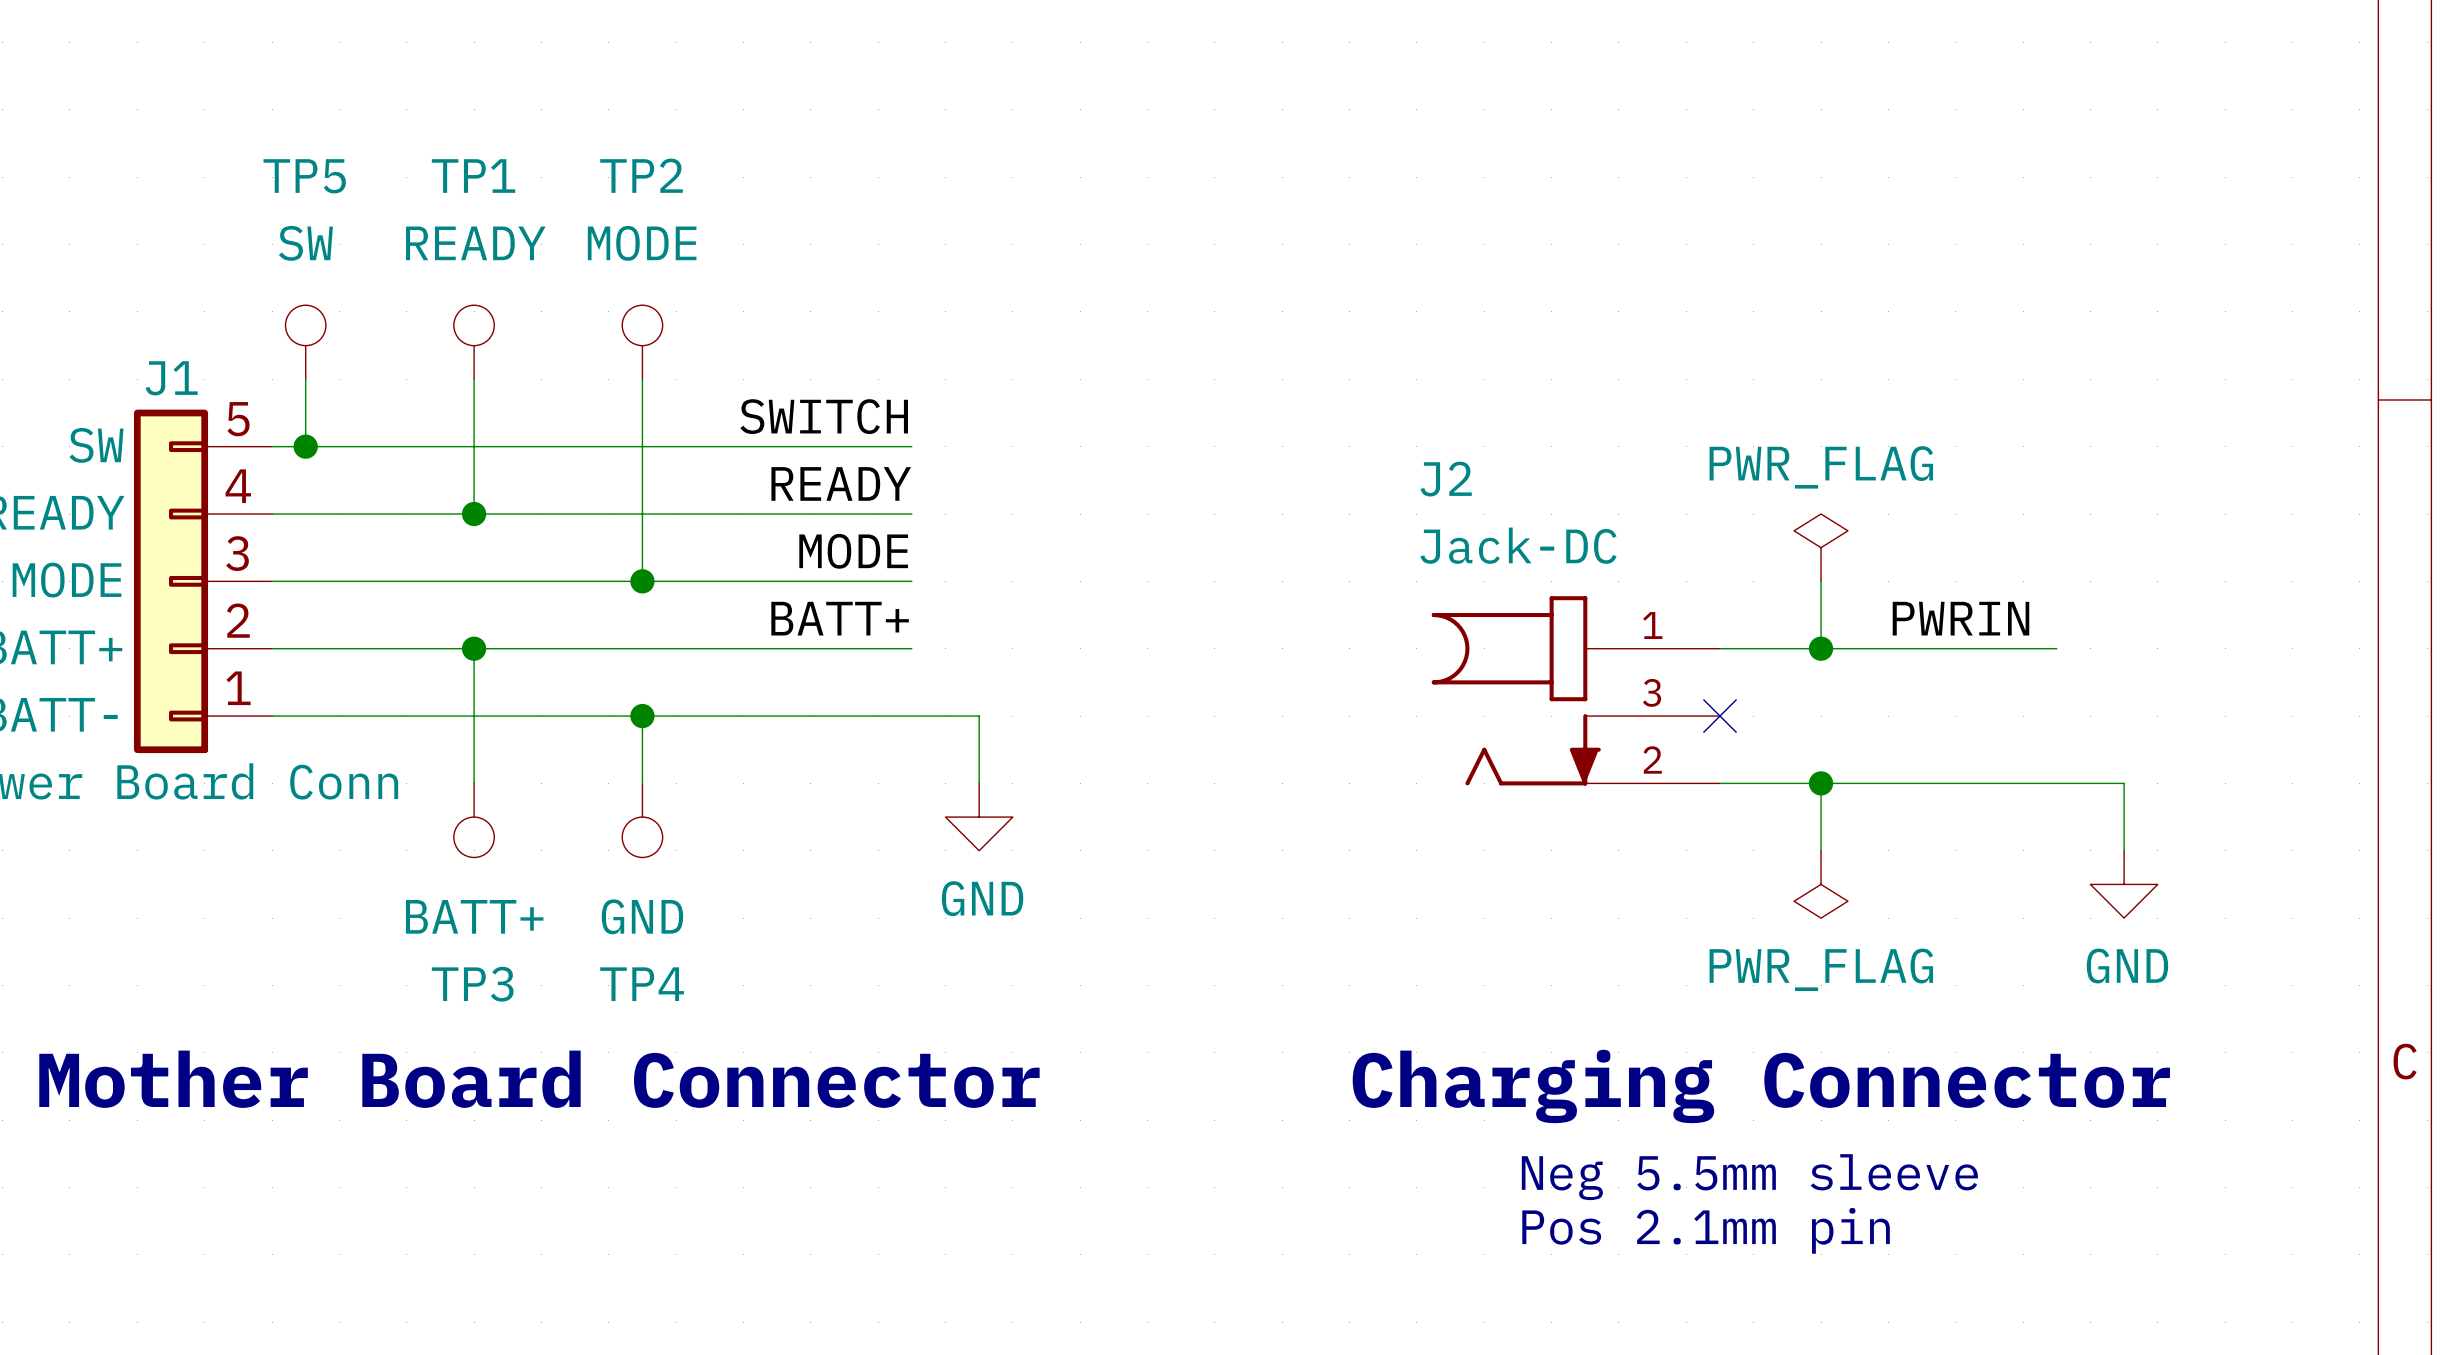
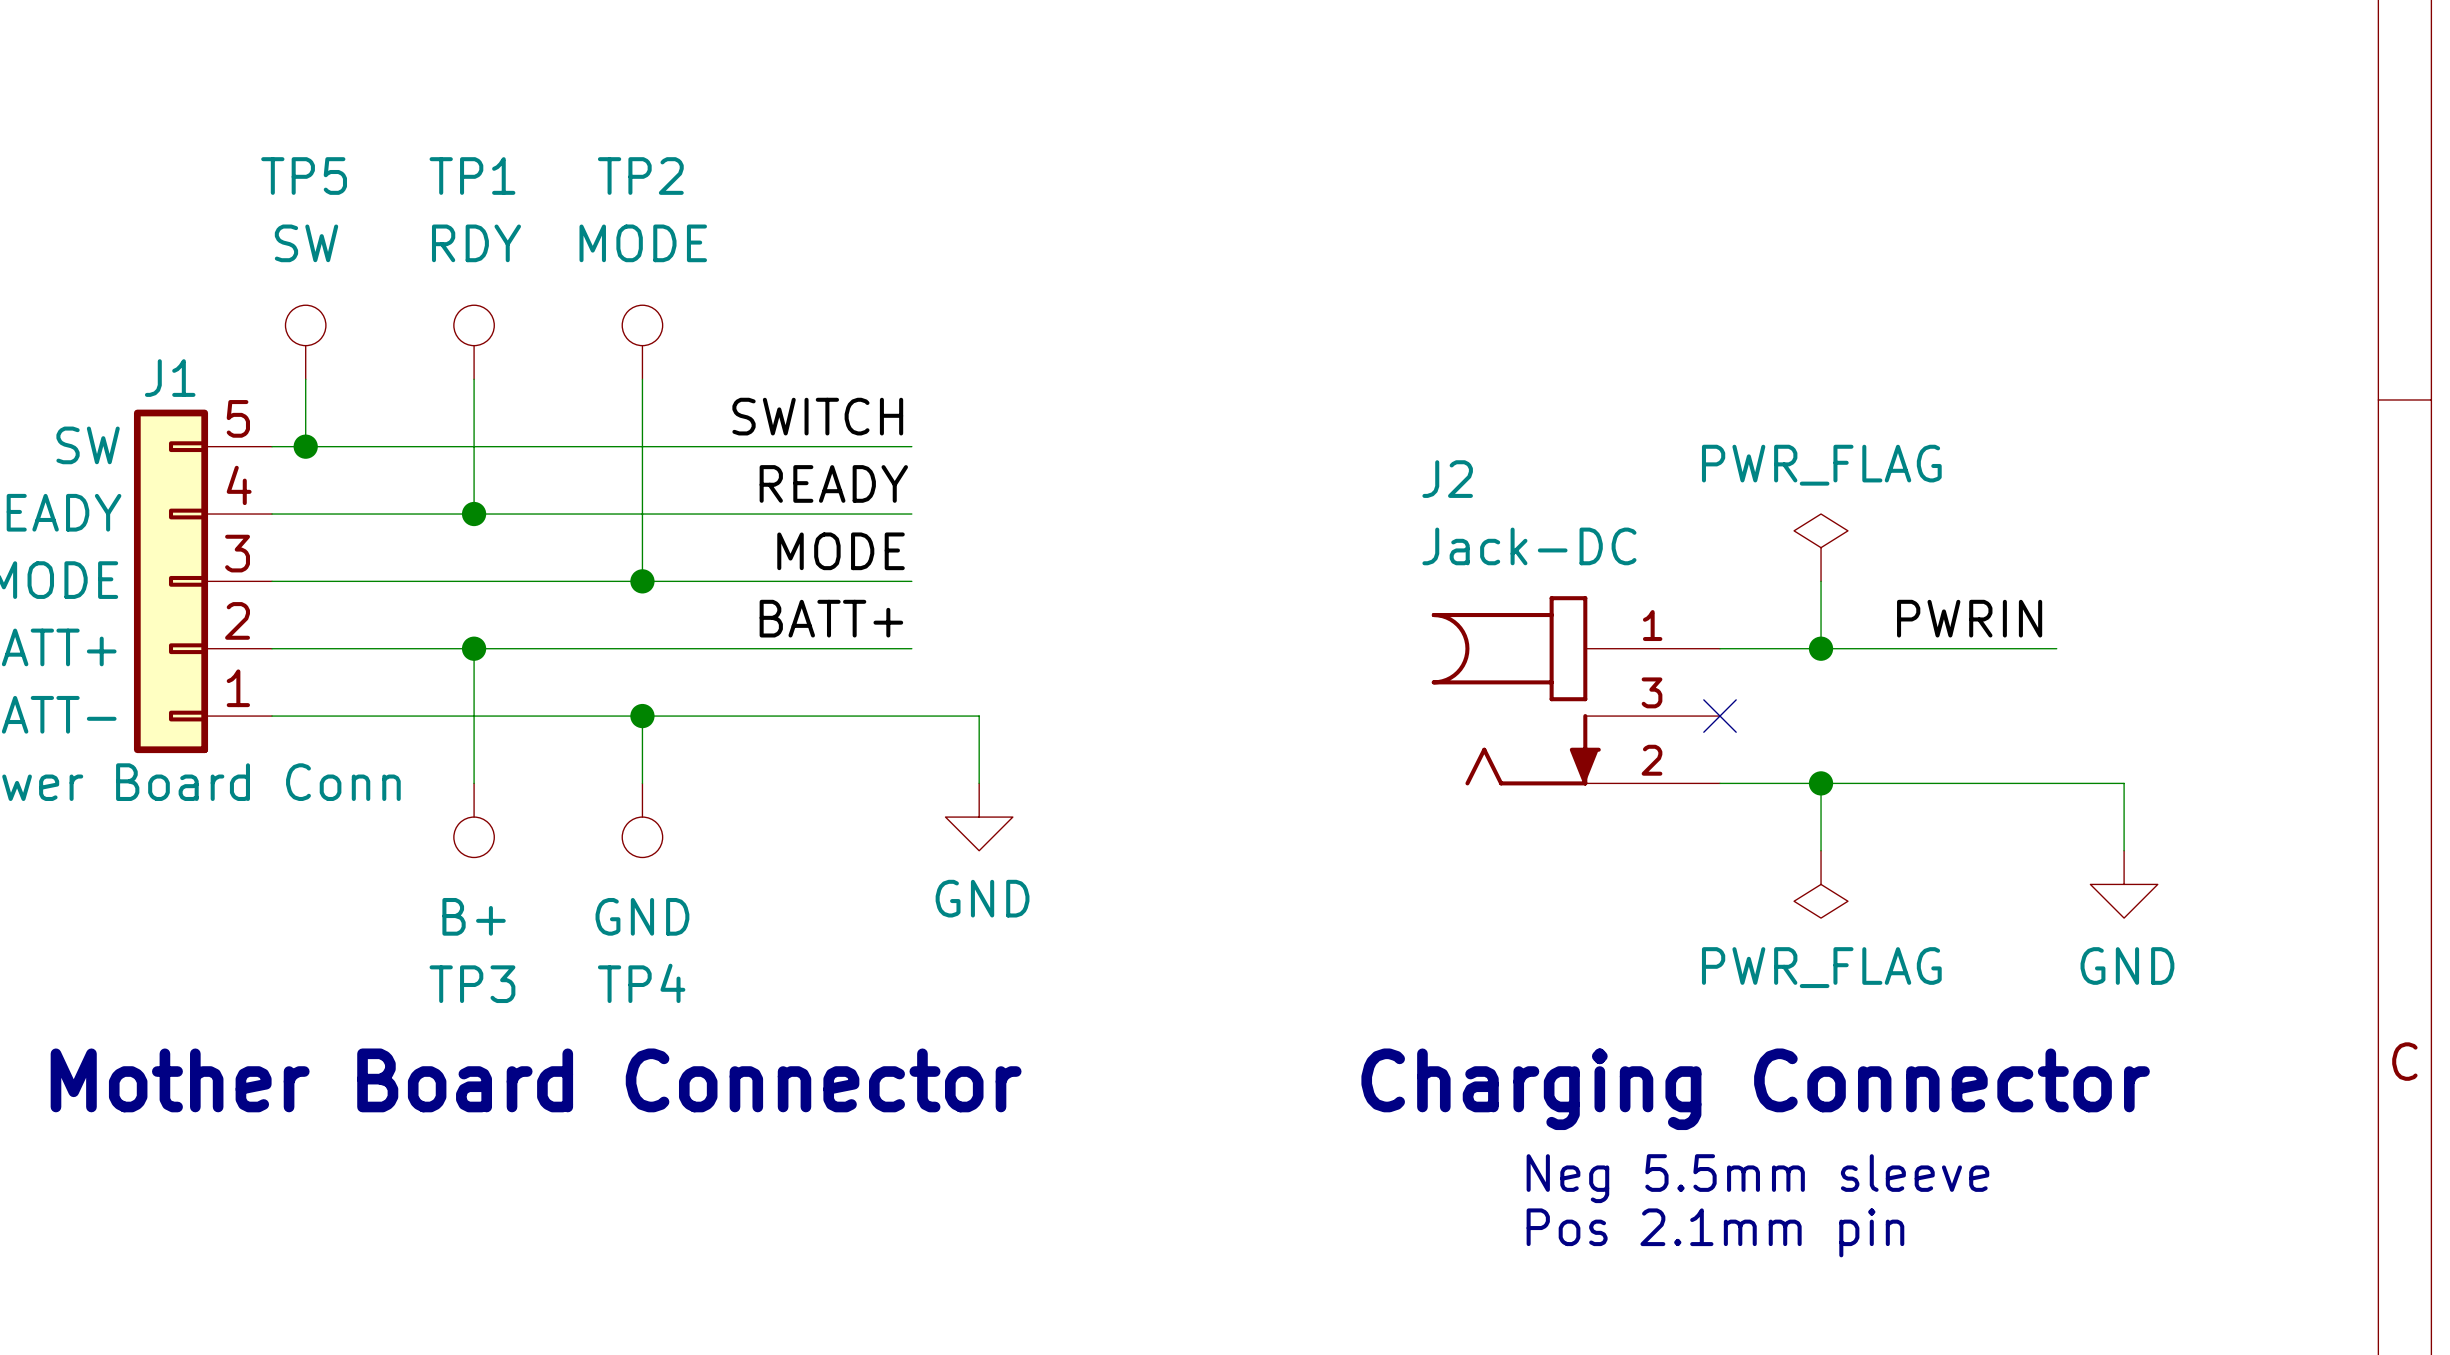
TP1 text: READY (475, 243) -> RDY (476, 243)
TP3 text: BATT+ (474, 916) -> B+ (474, 916)

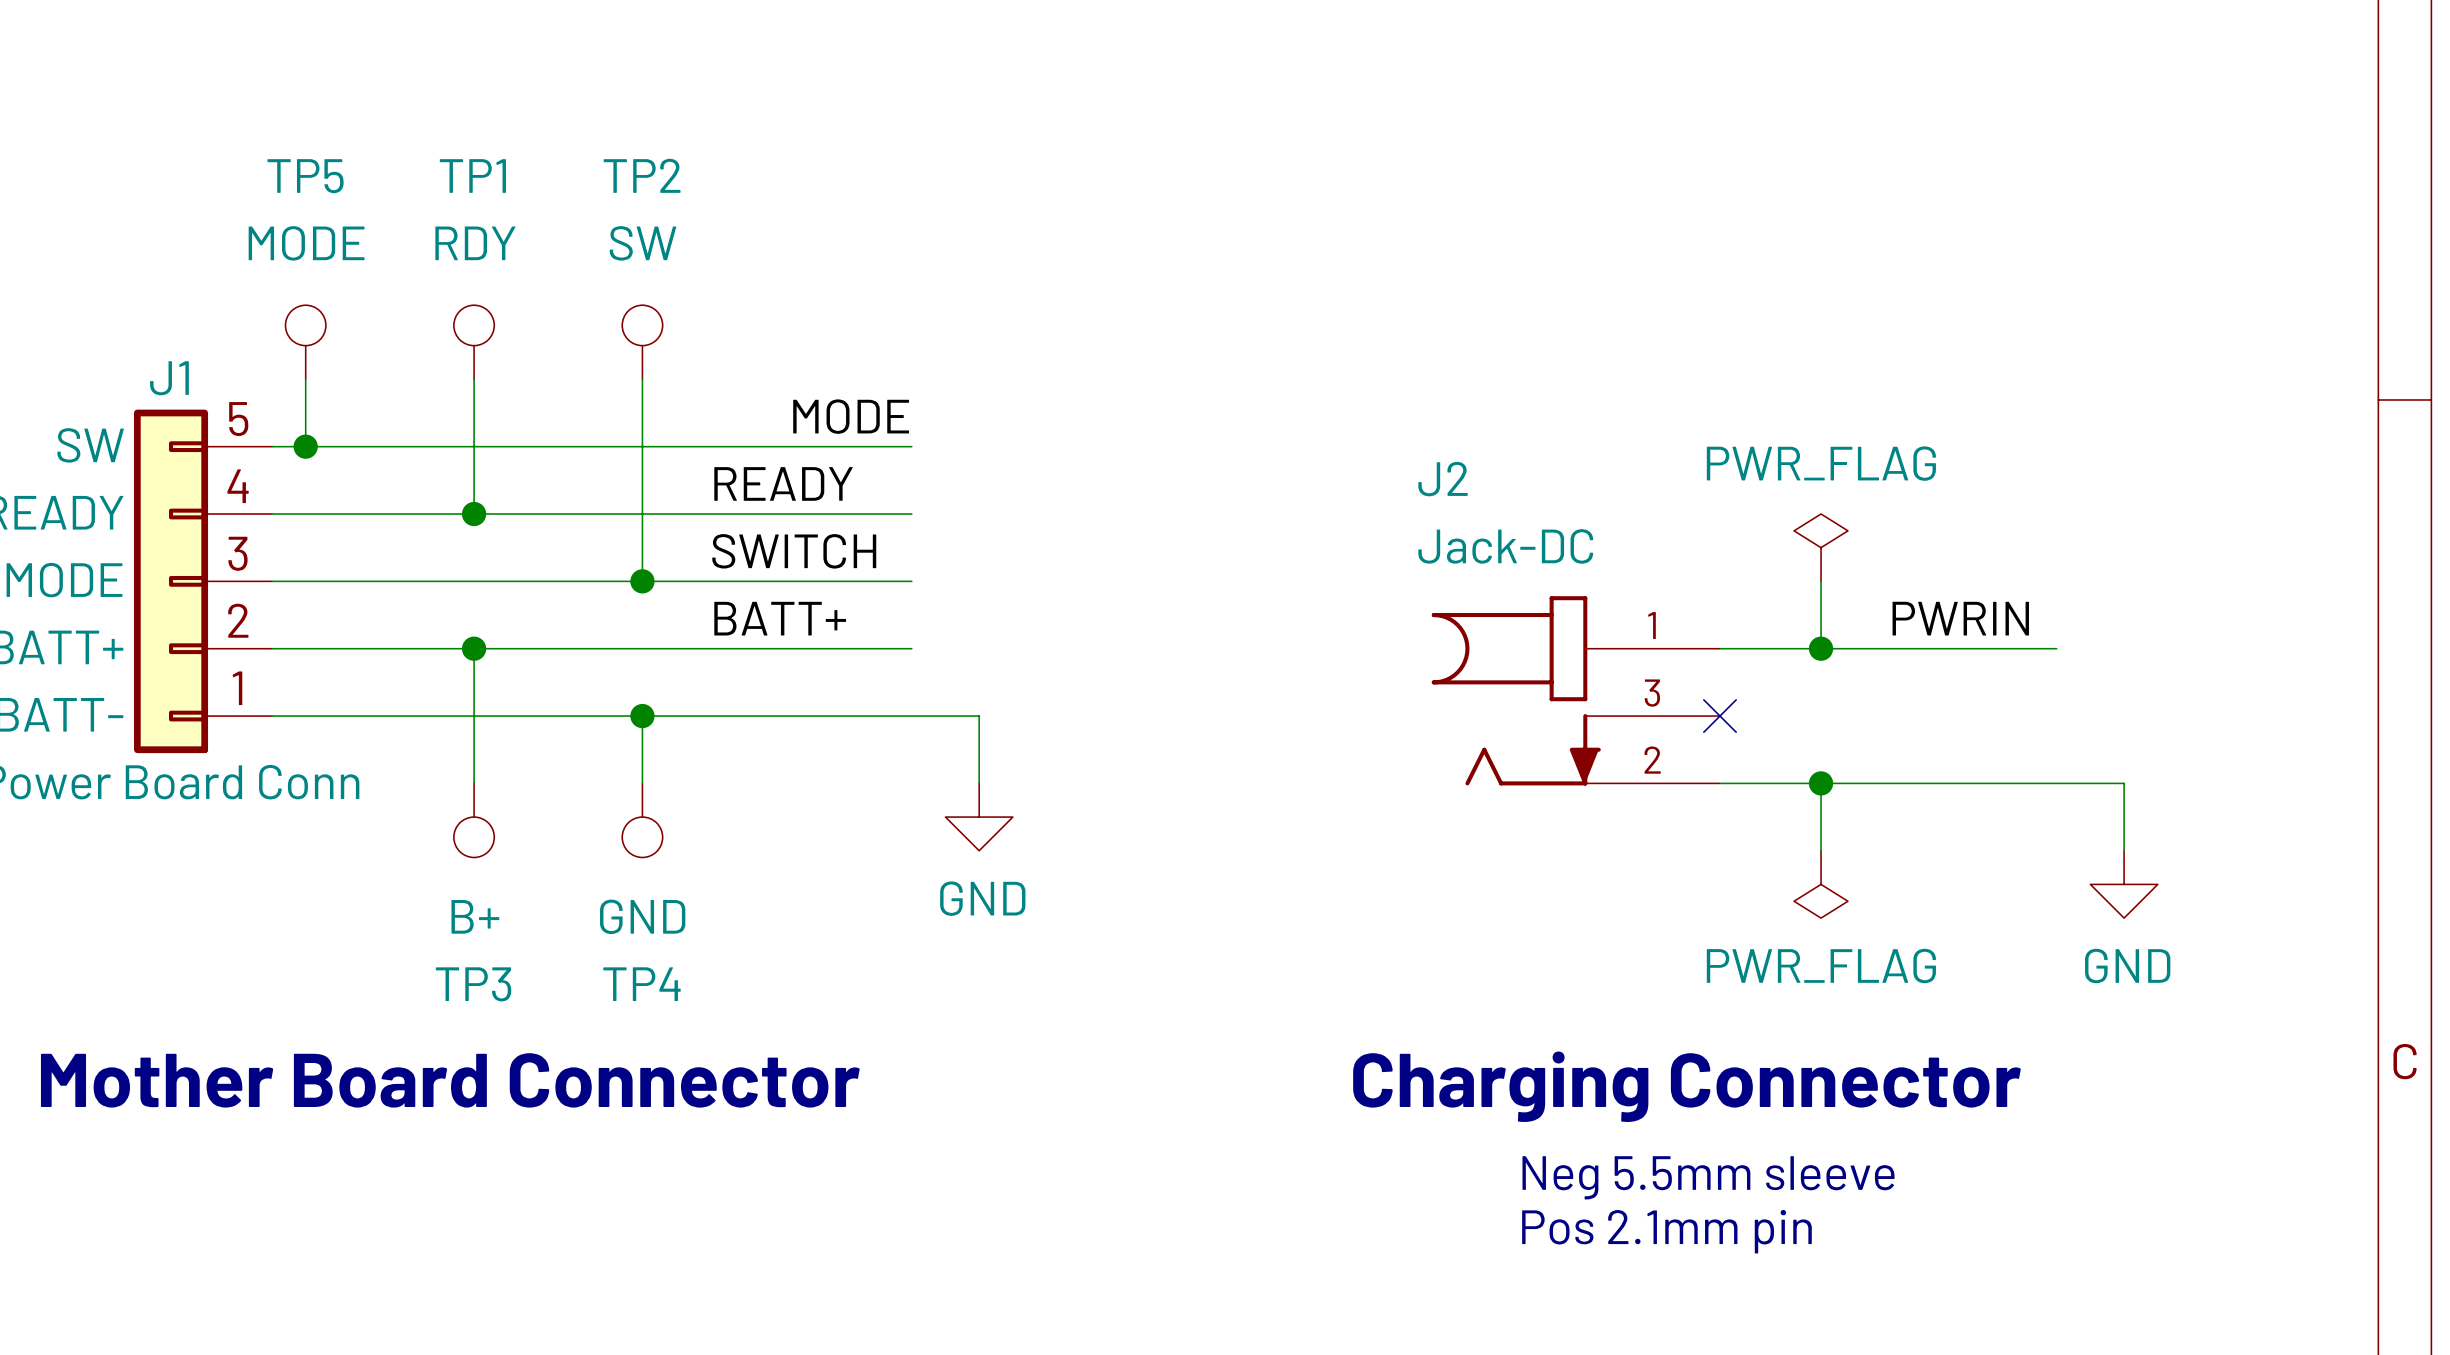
TP5 text: SW (306, 243) -> MODE (306, 243)
TP2 text: MODE (643, 243) -> SW (643, 243)
label: SWITCH (817, 416) -> MODE (851, 416)
label position: READY (833, 483) -> READY (783, 483)
label: none -> SWITCH (794, 551)
label: MODE (841, 551) -> none
label position: BATT+ (831, 618) -> BATT+ (780, 618)

